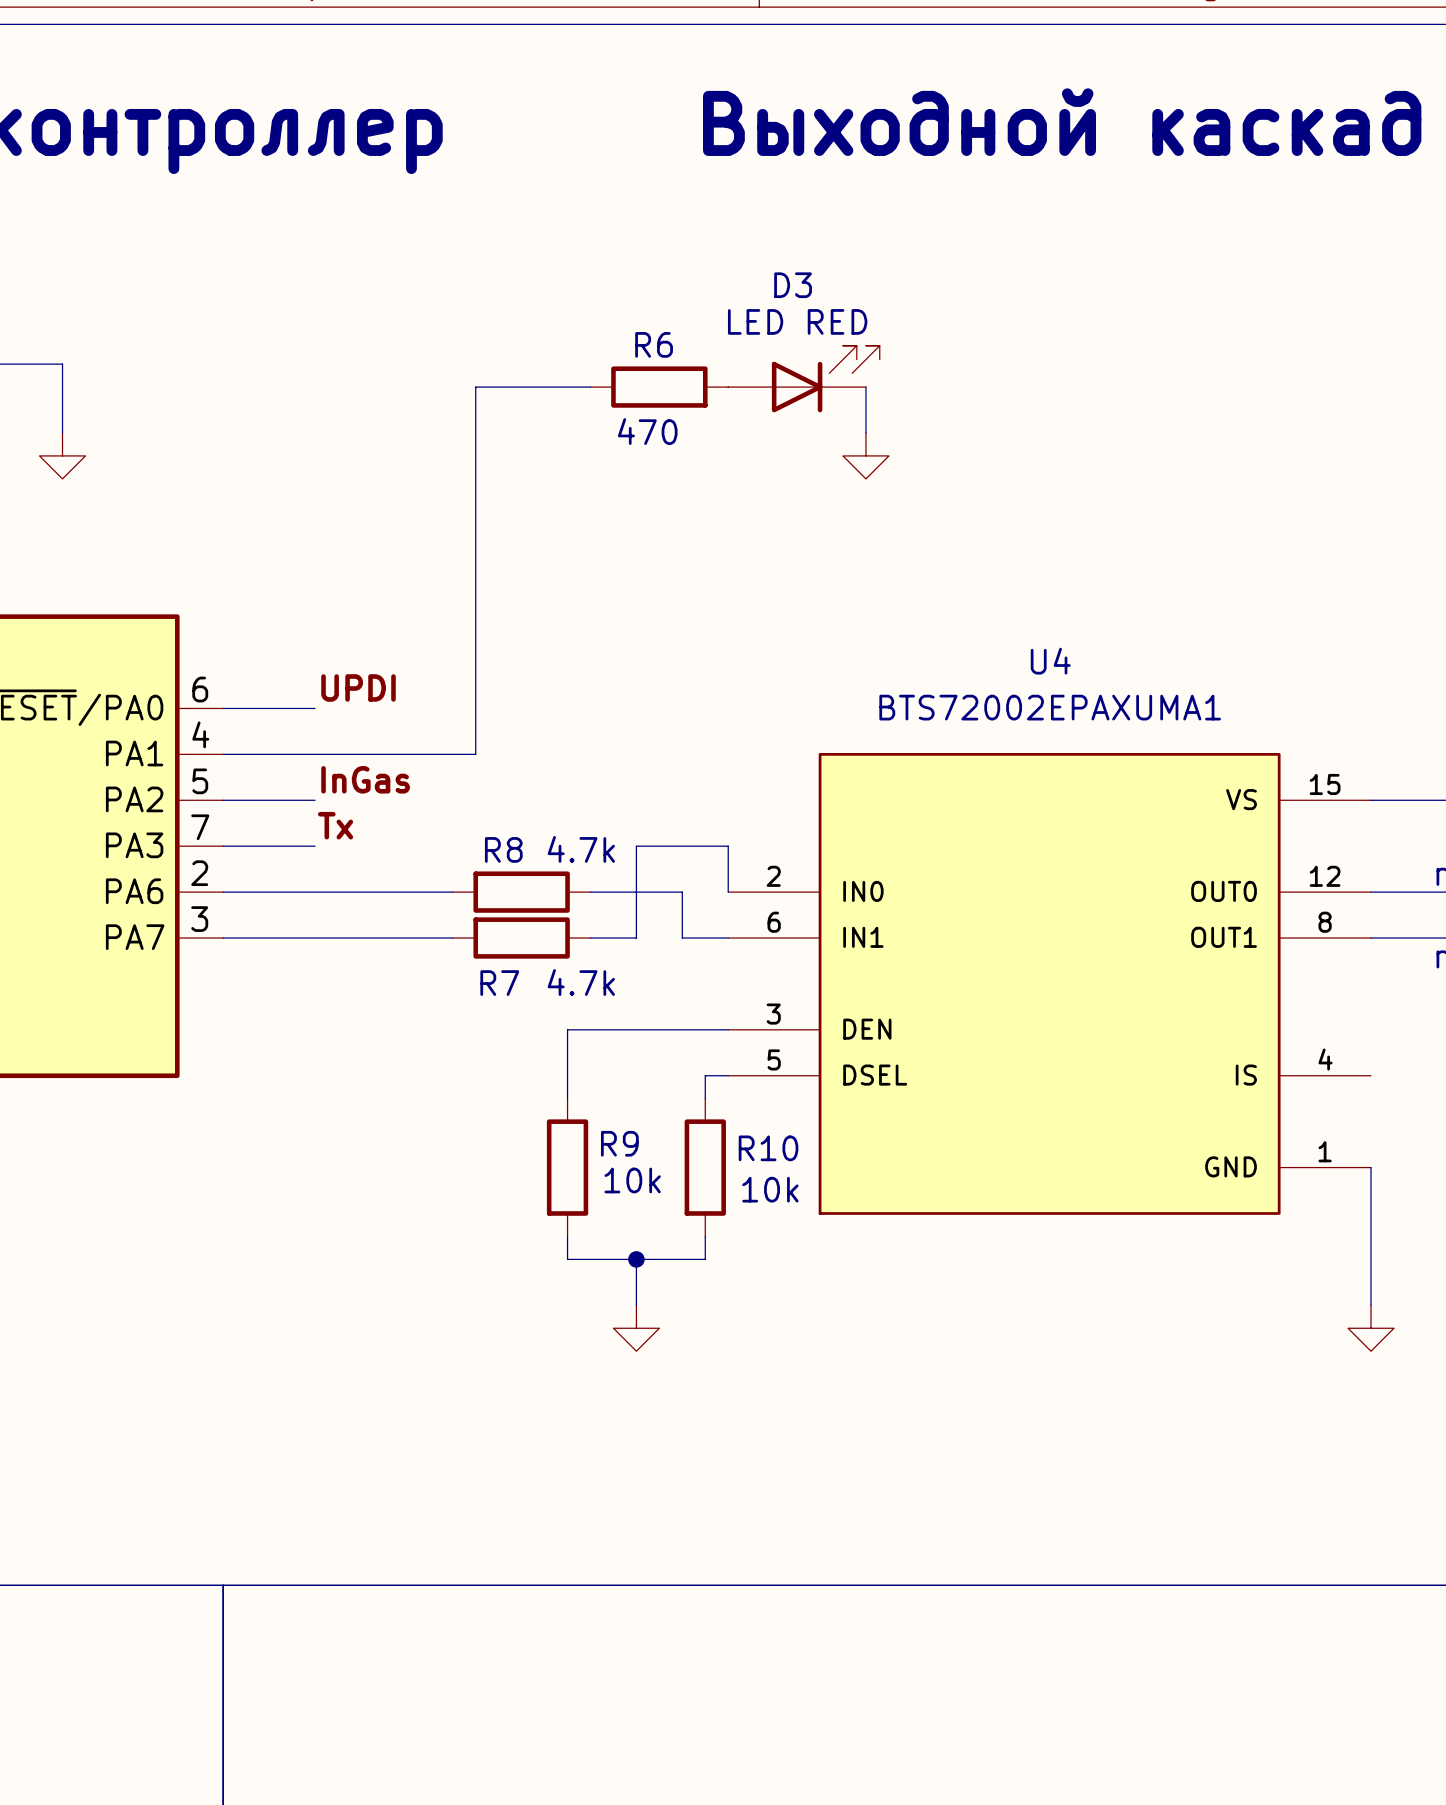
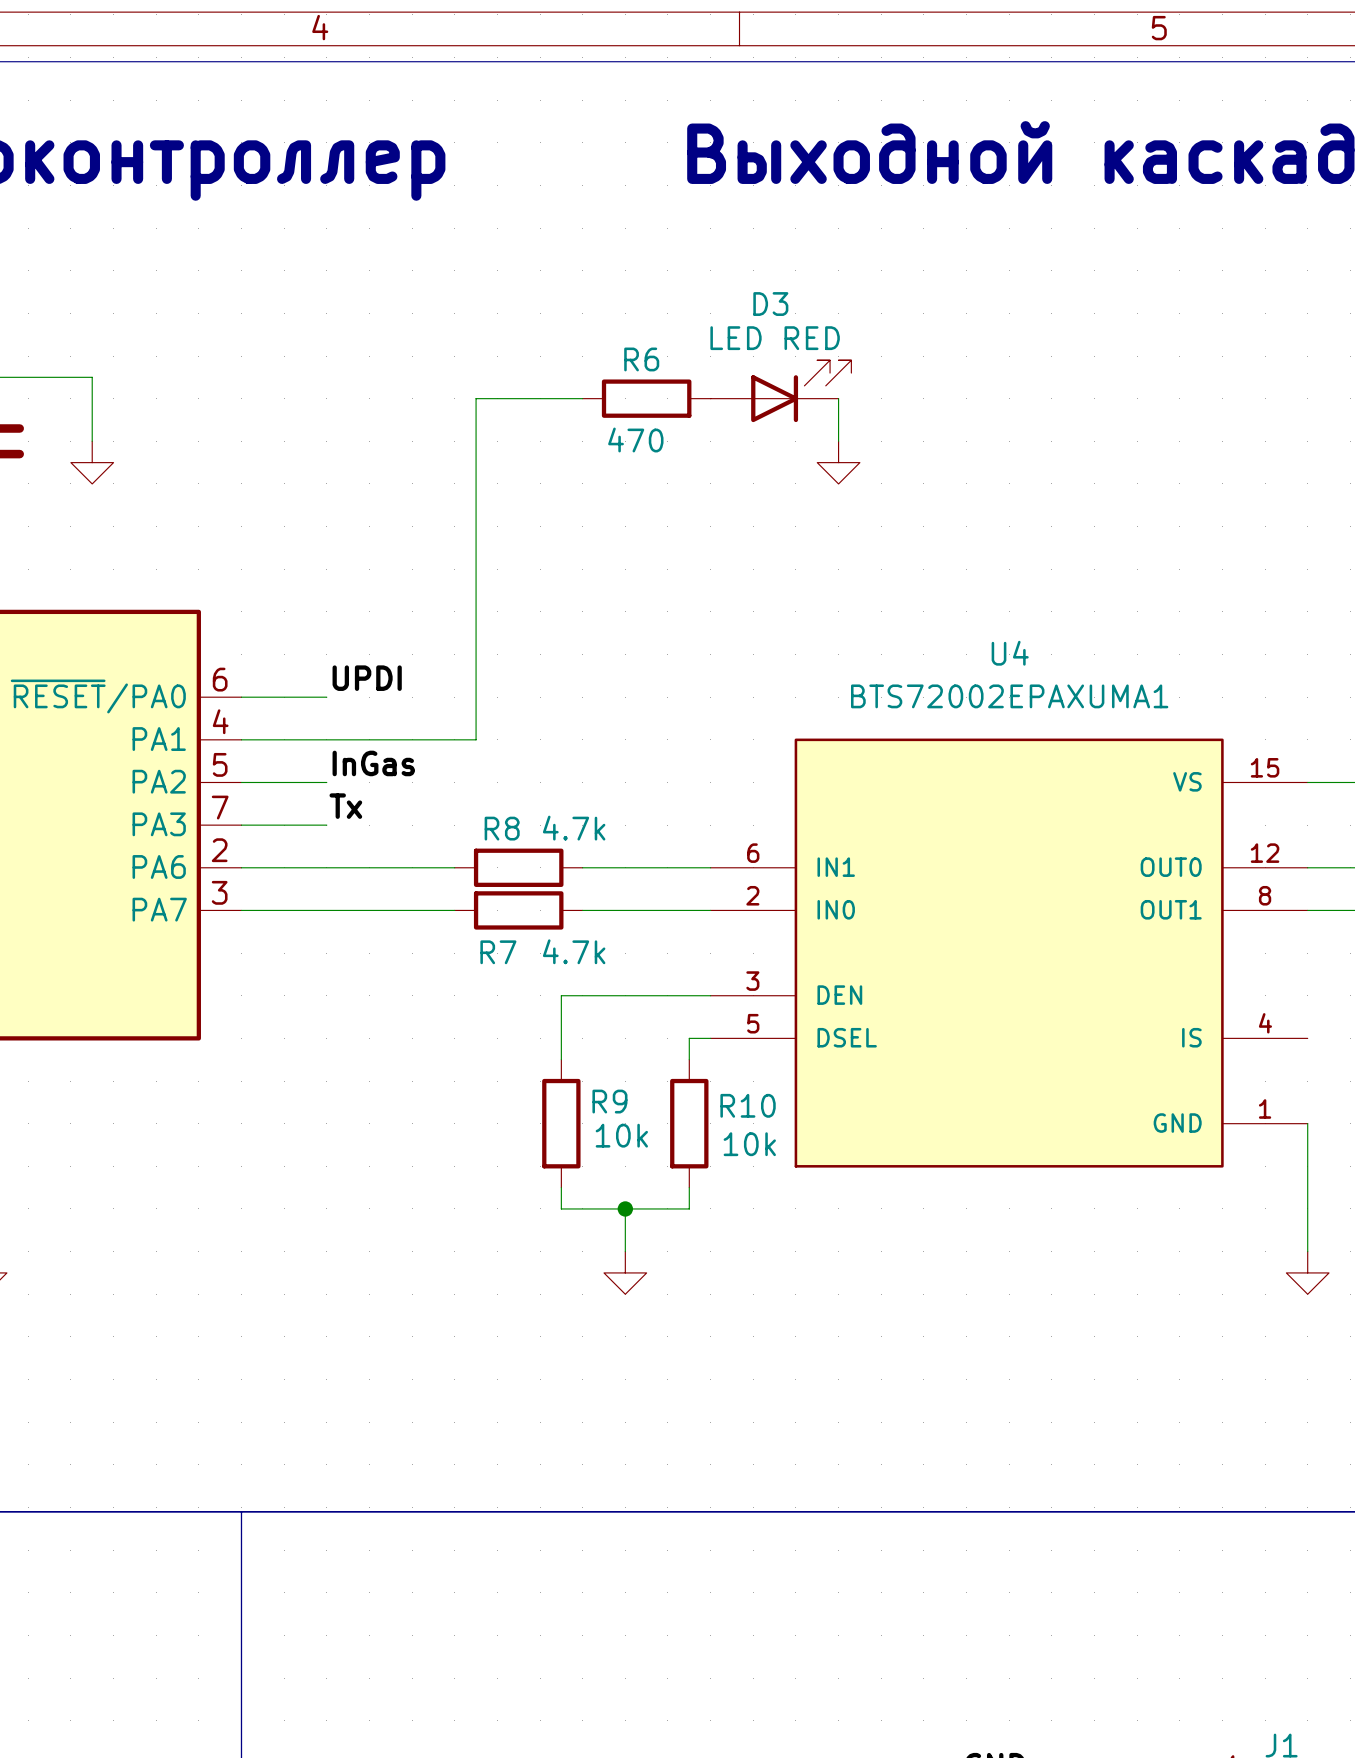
U4 pin number: 2 (773, 876) -> 6 (753, 853)
U4 pin name: IN0 (863, 891) -> IN1 (836, 867)
wire: (682, 892) (682, 938) -> (667, 867) (710, 867)
wire: (728, 892) (728, 846) (636, 846) (636, 938) -> (667, 910) (625, 910)
U4 pin number: 6 (774, 922) -> 2 (752, 895)
U4 pin name: IN1 (863, 937) -> IN0 (836, 909)

